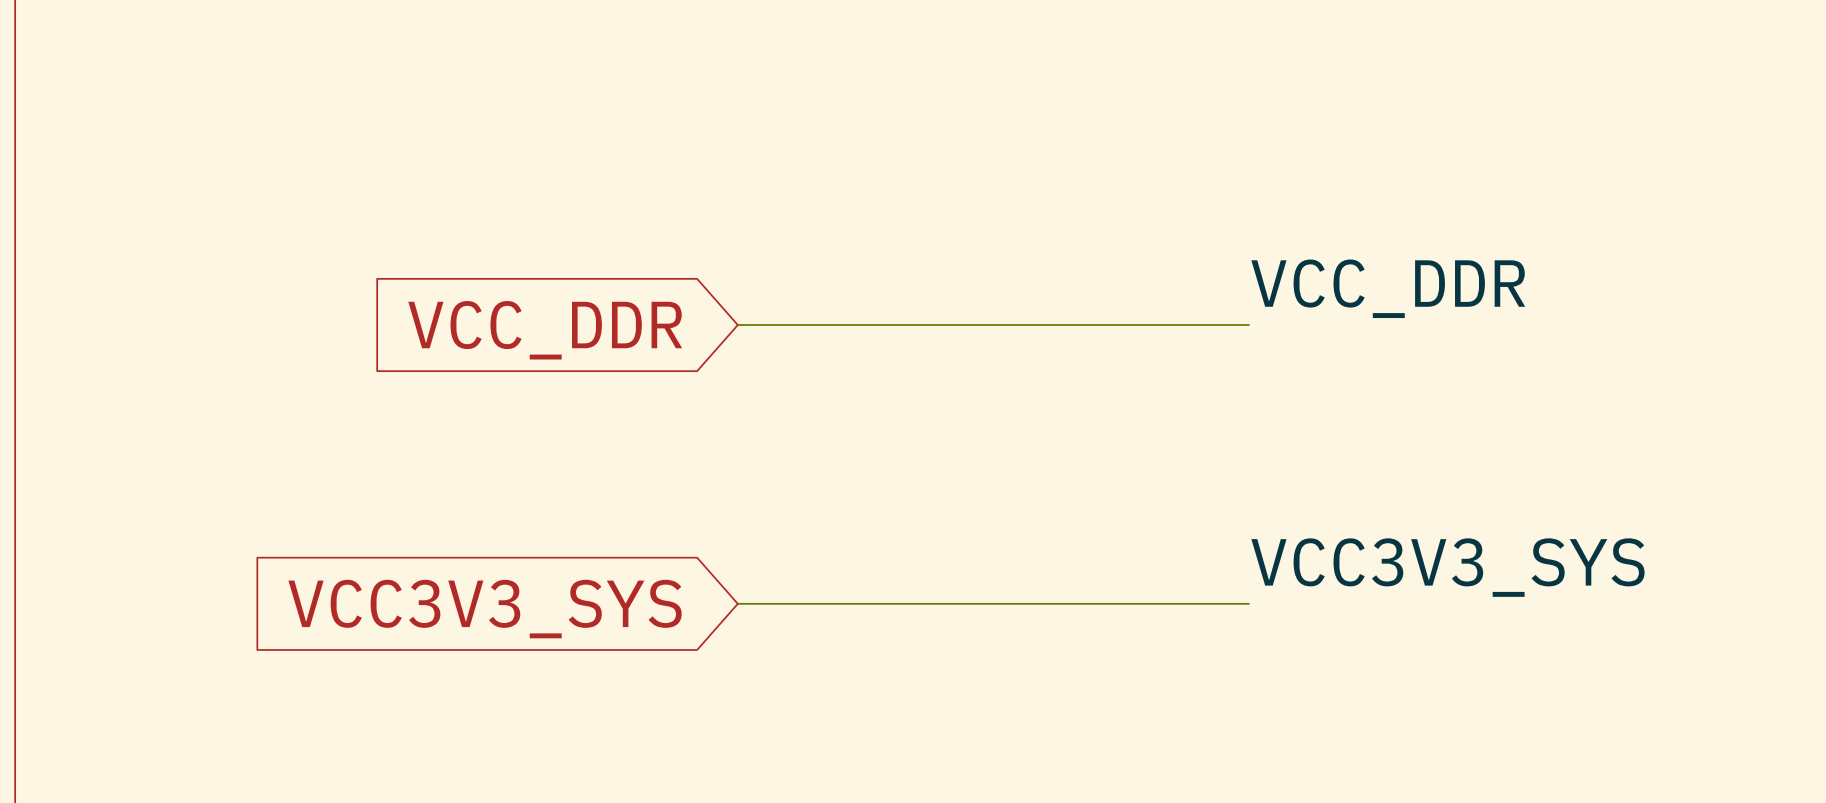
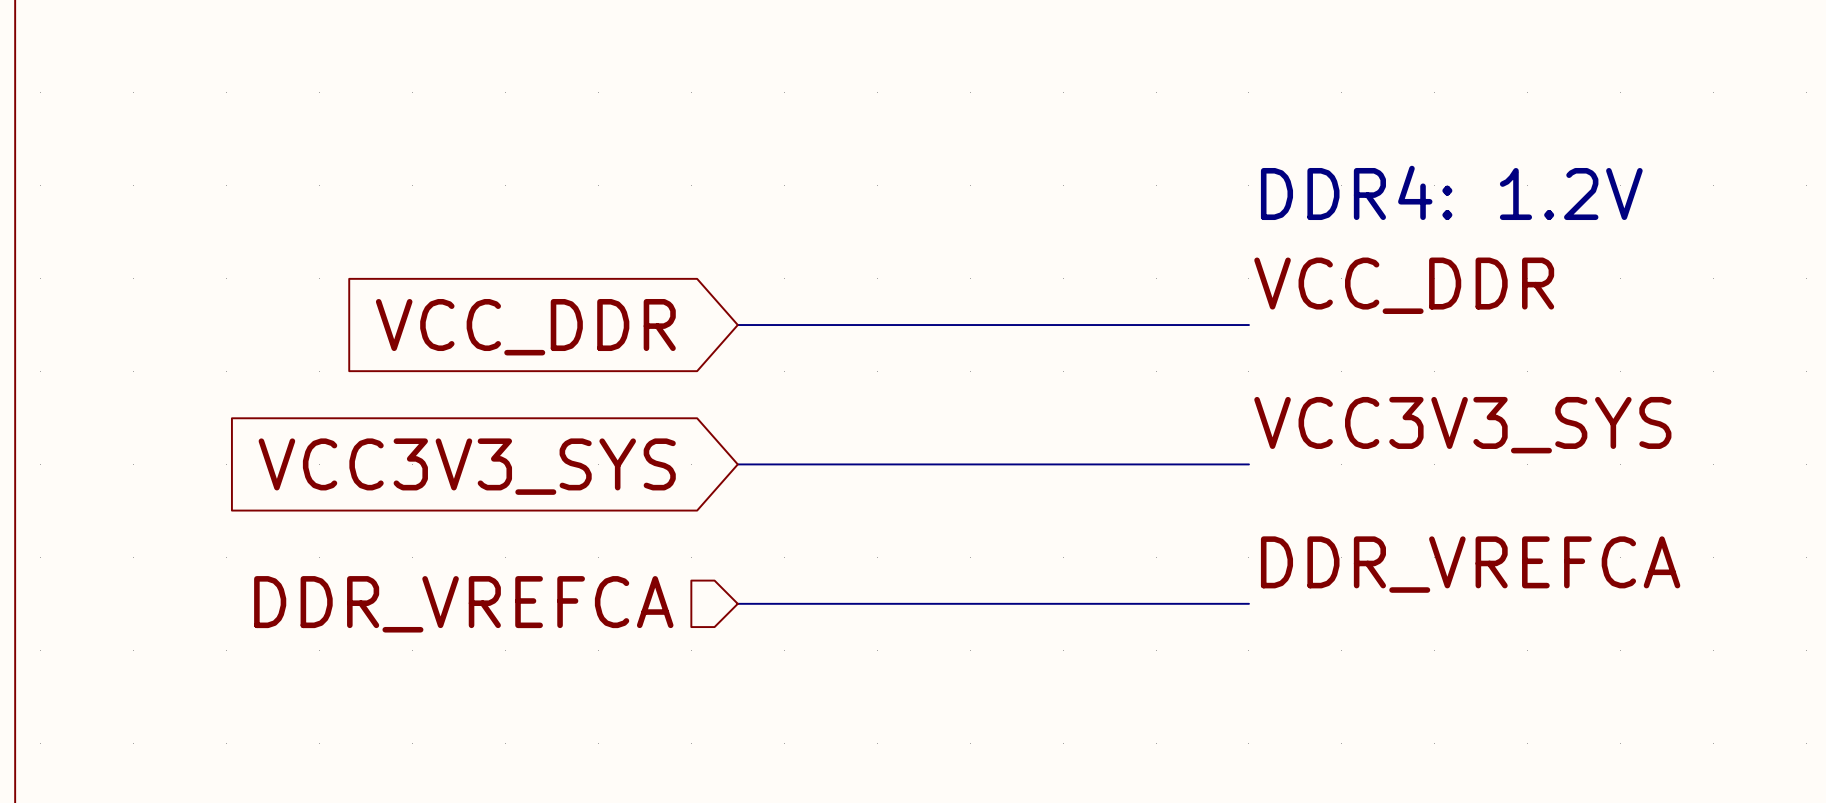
text: none -> DDR4: 1.2V (1451, 192)
label: none -> VCC3V3_SYS (1462, 425)
wire: none -> (737, 464) (1248, 464)
label: VCC3V3_SYS (1447, 567) -> DDR_VREFCA (1470, 564)
hierarchical label: none -> DDR_VREFCA (463, 604)
global label position: VCC3V3_SYS (485, 609) -> VCC3V3_SYS (467, 466)

